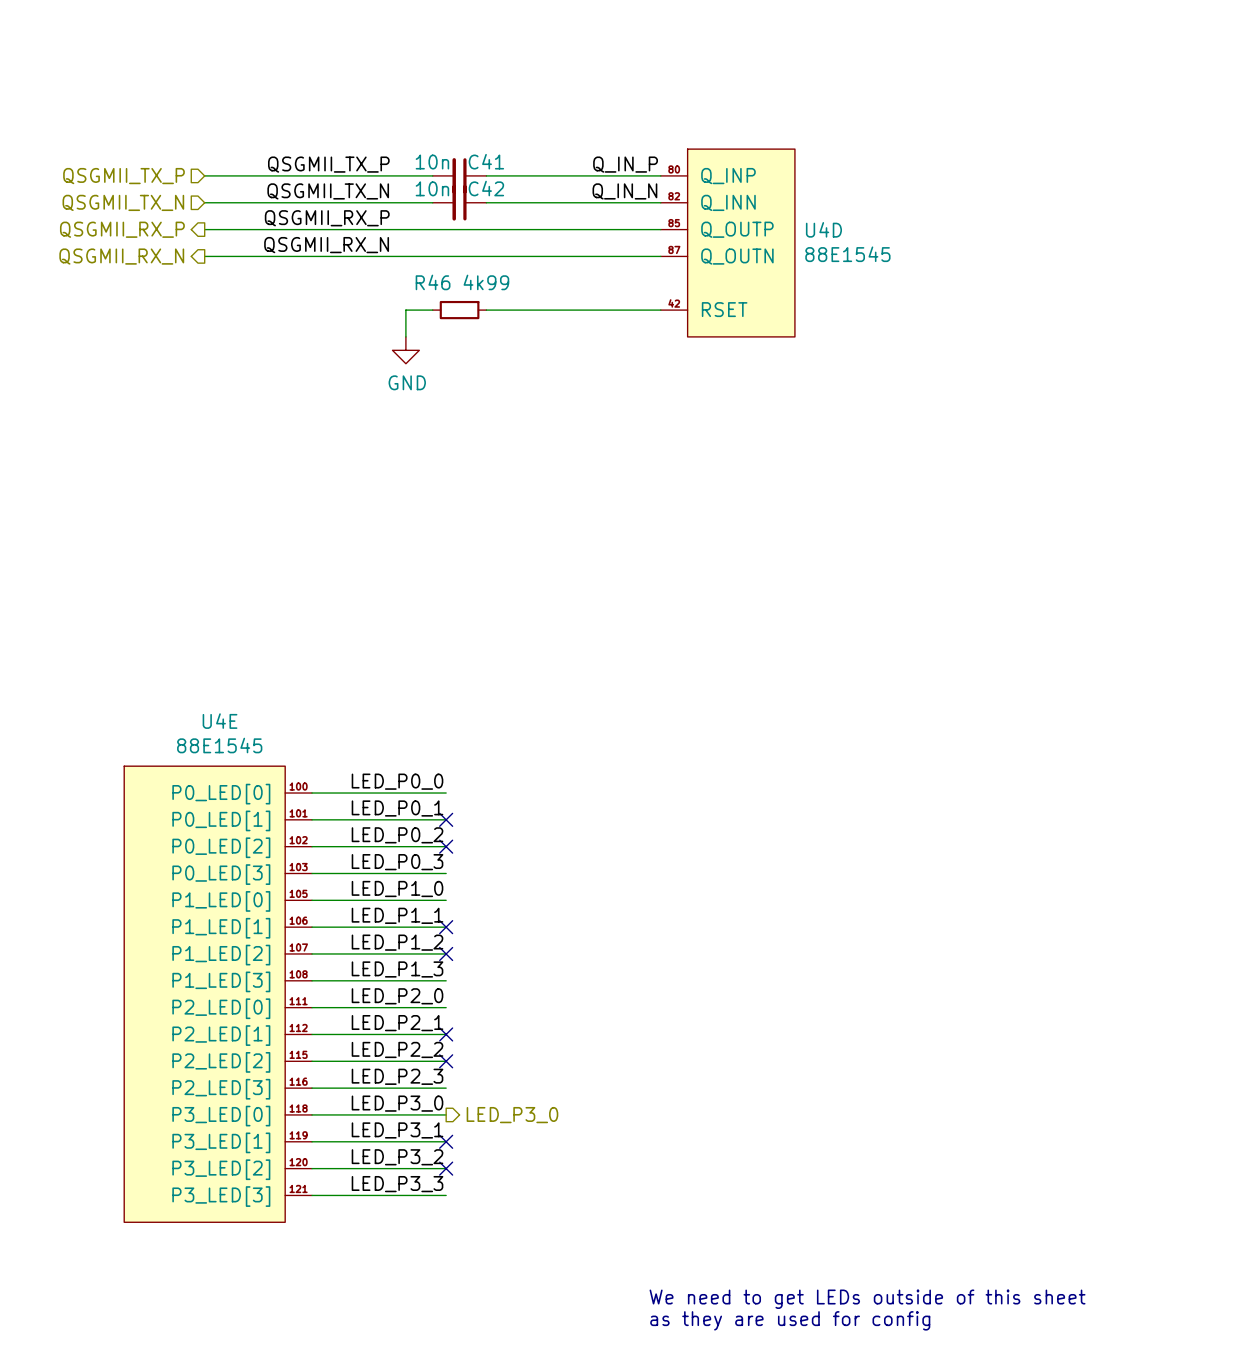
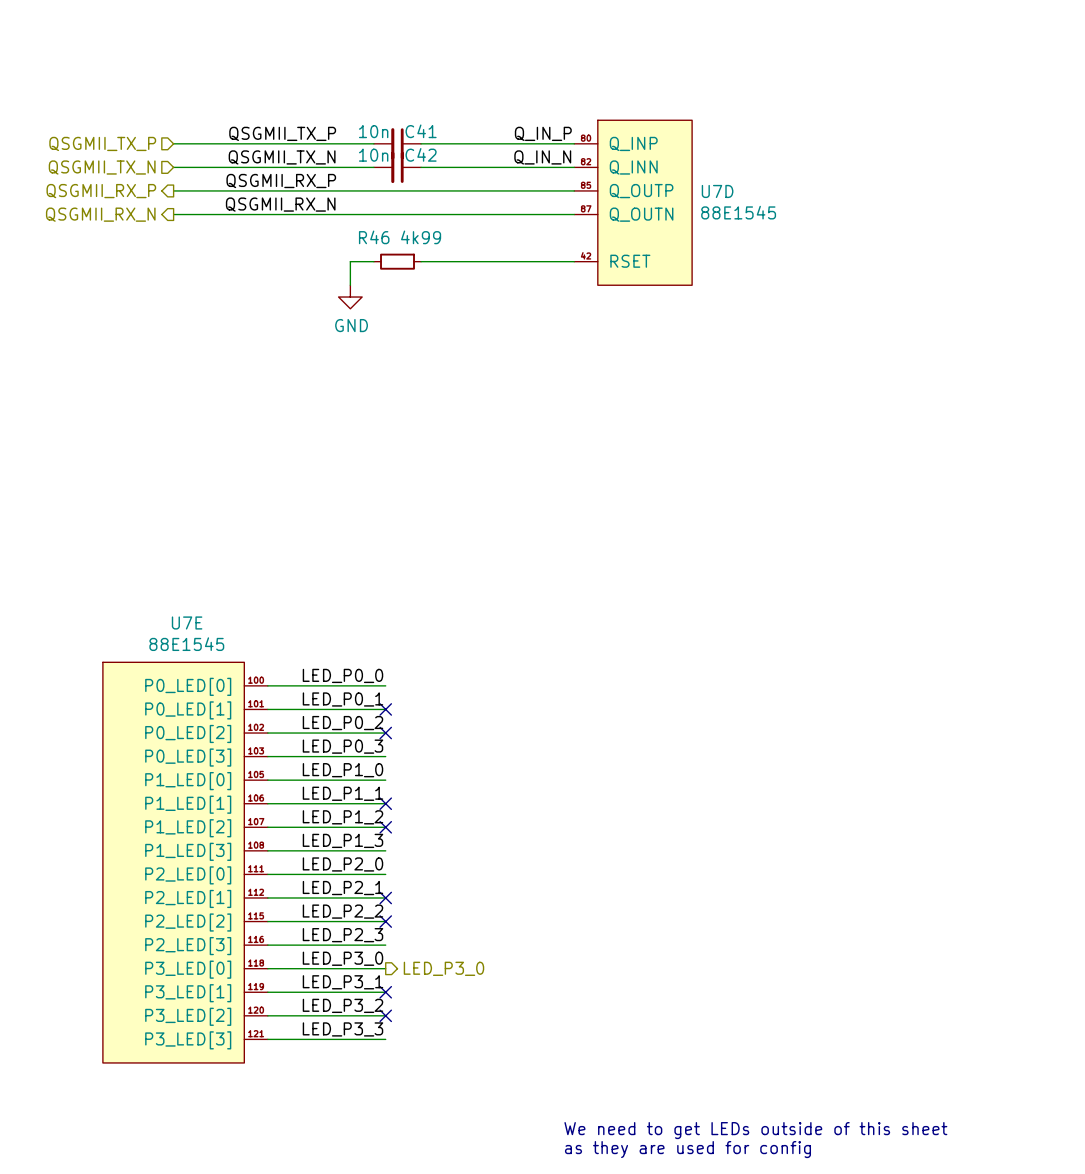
U4D name: U4D (823, 229) -> U7D (717, 191)
U4E name: U4E (220, 721) -> U7E (187, 622)

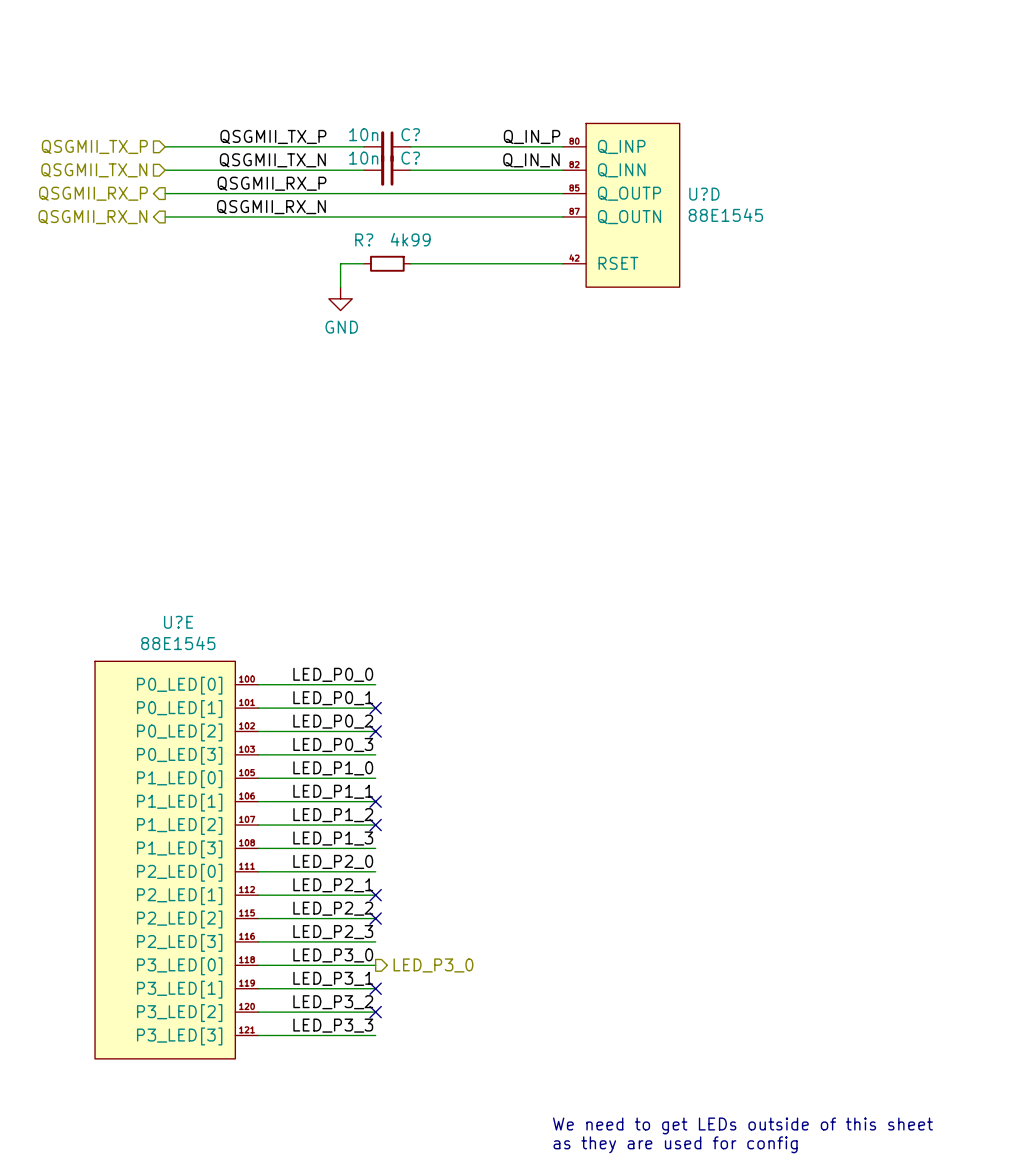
C41 name: C41 (421, 131) -> C? (410, 134)
C42 name: C42 (421, 154) -> C? (410, 158)
U7D name: U7D (717, 191) -> U?D (704, 194)
R46 name: R46 (374, 237) -> R? (364, 239)
U7E name: U7E (187, 622) -> U?E (178, 622)

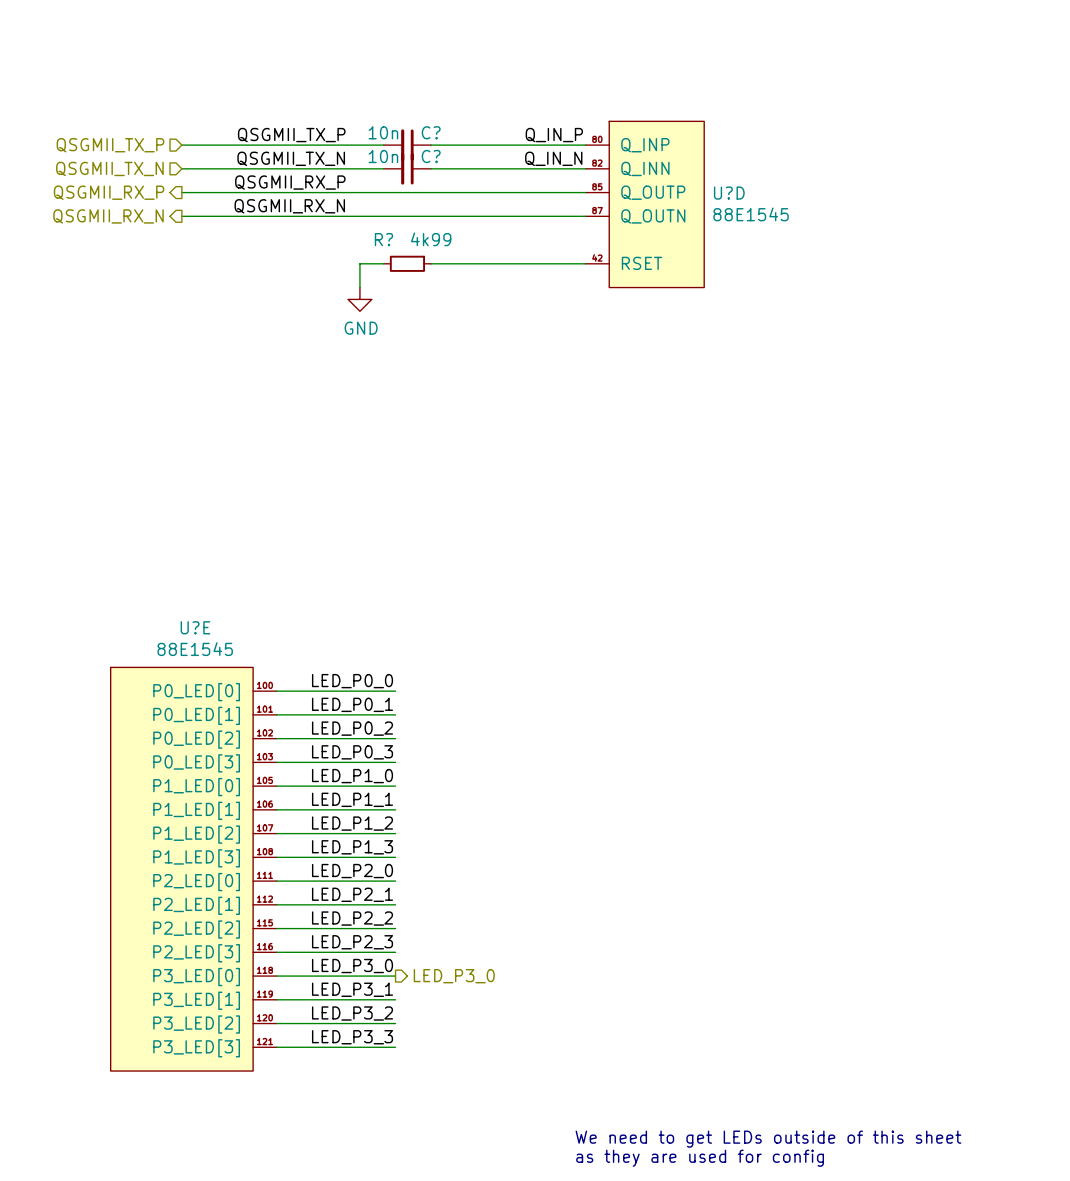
no-connect mark: (375, 708) -> none
no-connect mark: (375, 731) -> none
no-connect mark: (375, 801) -> none
no-connect mark: (375, 825) -> none
no-connect mark: (375, 895) -> none
no-connect mark: (375, 918) -> none
no-connect mark: (375, 988) -> none
no-connect mark: (375, 1012) -> none

